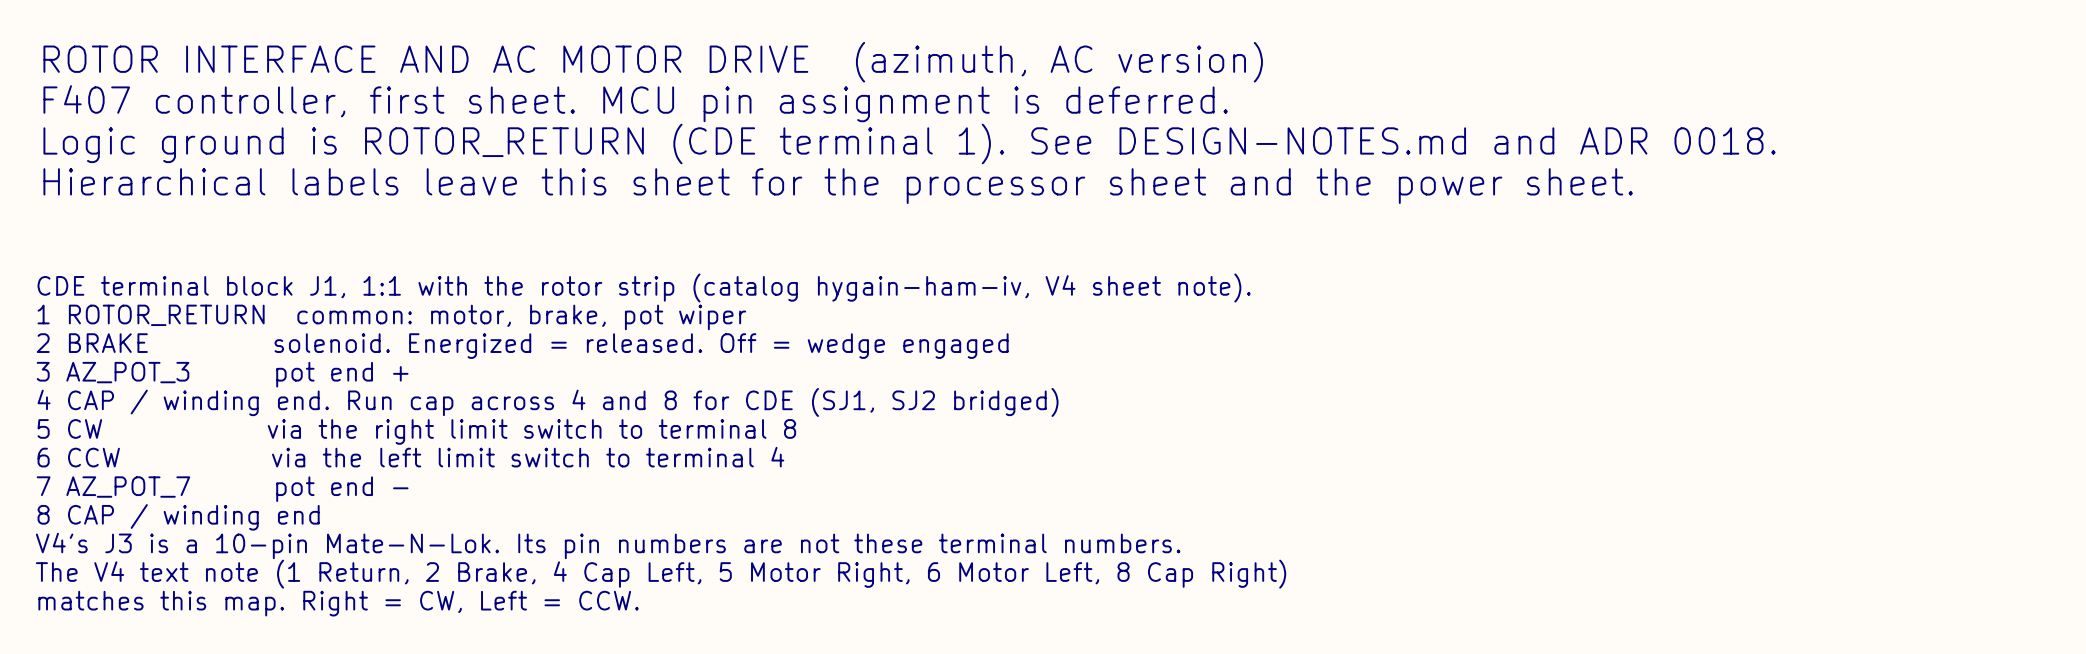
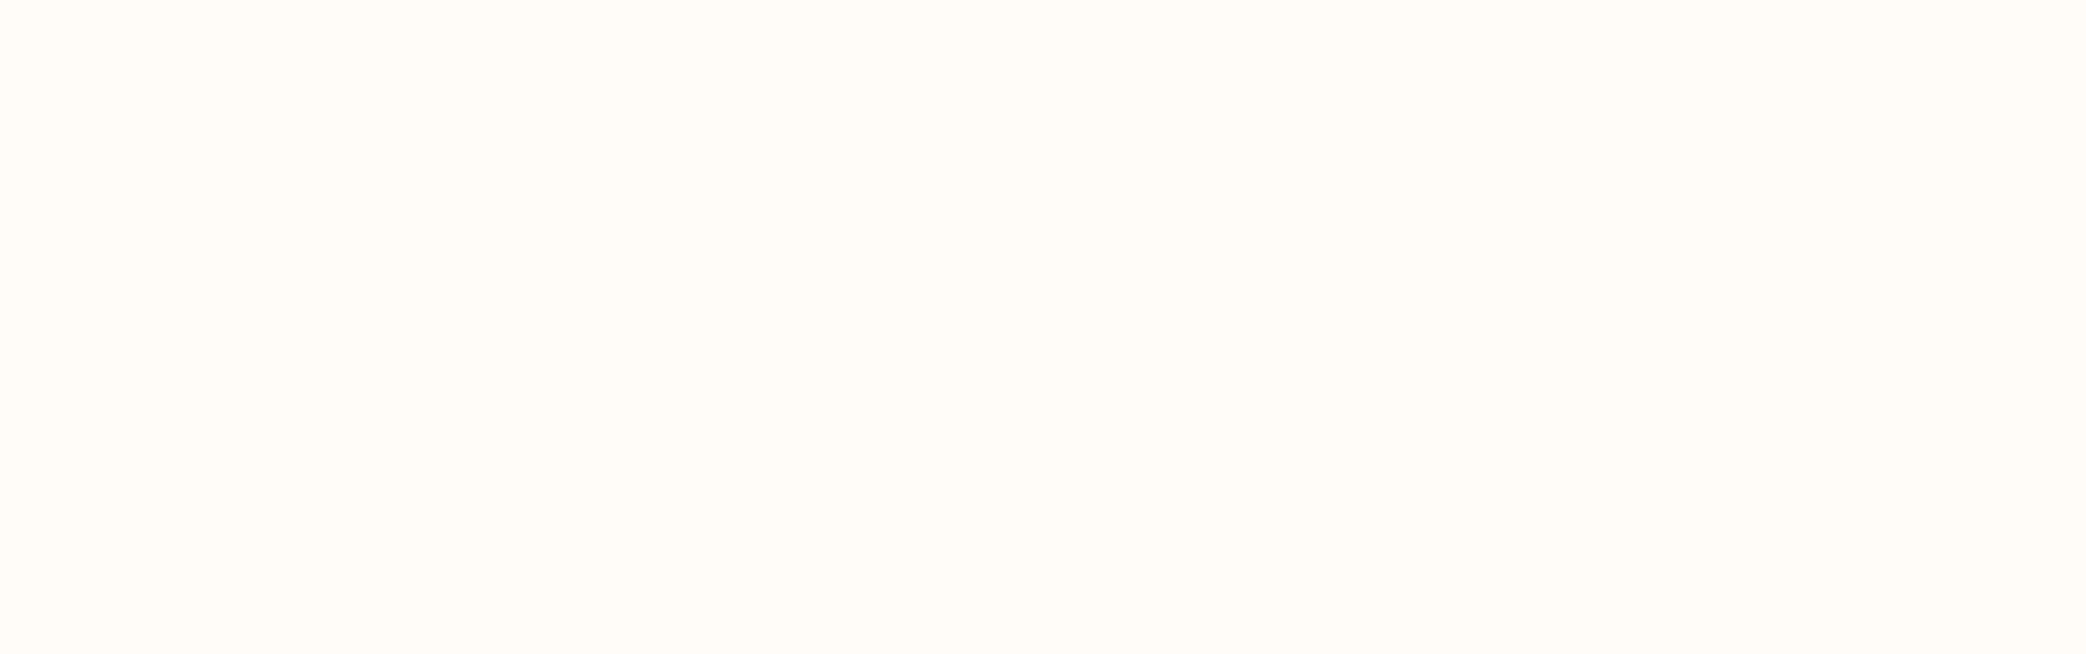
text: ROTOR INTERFACE AND AC MOTOR DRIVE (azimuth, AC version) (653, 62) -> none
text: F407 controller, first sheet. MCU pin assignment is deferred. (635, 103) -> none
text: Logic ground is ROTOR_RETURN (CDE terminal 1). See DESIGN-NOTES.md and ADR 0018. (909, 143) -> none
text: Hierarchical labels leave this sheet for the processor sheet and the power sheet. (838, 186) -> none
text: CDE terminal block J1, 1:1 with the rotor strip (catalog hygain-ham-iv, V4 sheet note). (644, 287) -> none
text: 1 ROTOR_RETURN common: motor, brake, pot wiper (391, 317) -> none
text: 2 BRAKE solenoid. Energized = released. Off = wedge engaged (522, 346) -> none
text: 3 AZ_POT_3 pot end + (222, 374) -> none
text: 4 CAP / winding end. Run cap across 4 and 8 for CDE (SJ1, SJ2 bridged) (548, 402) -> none
text: 5 CW via the right limit switch to terminal 8 (416, 431) -> none
text: 6 CCW via the left limit switch to terminal 4 (410, 457) -> none
text: 7 AZ_POT_7 pot end - (222, 489) -> none
text: 8 CAP / winding end (178, 517) -> none
text: V4's J3 is a 10-pin Mate-N-Lok. Its pin numbers are not these terminal numbers. (608, 545) -> none
text: The V4 text note (1 Return, 2 Brake, 4 Cap Left, 5 Motor Right, 6 Motor Left, 8 Cap Right) (661, 574) -> none
text: matches this map. Right = CW, Left = CCW. (338, 603) -> none

